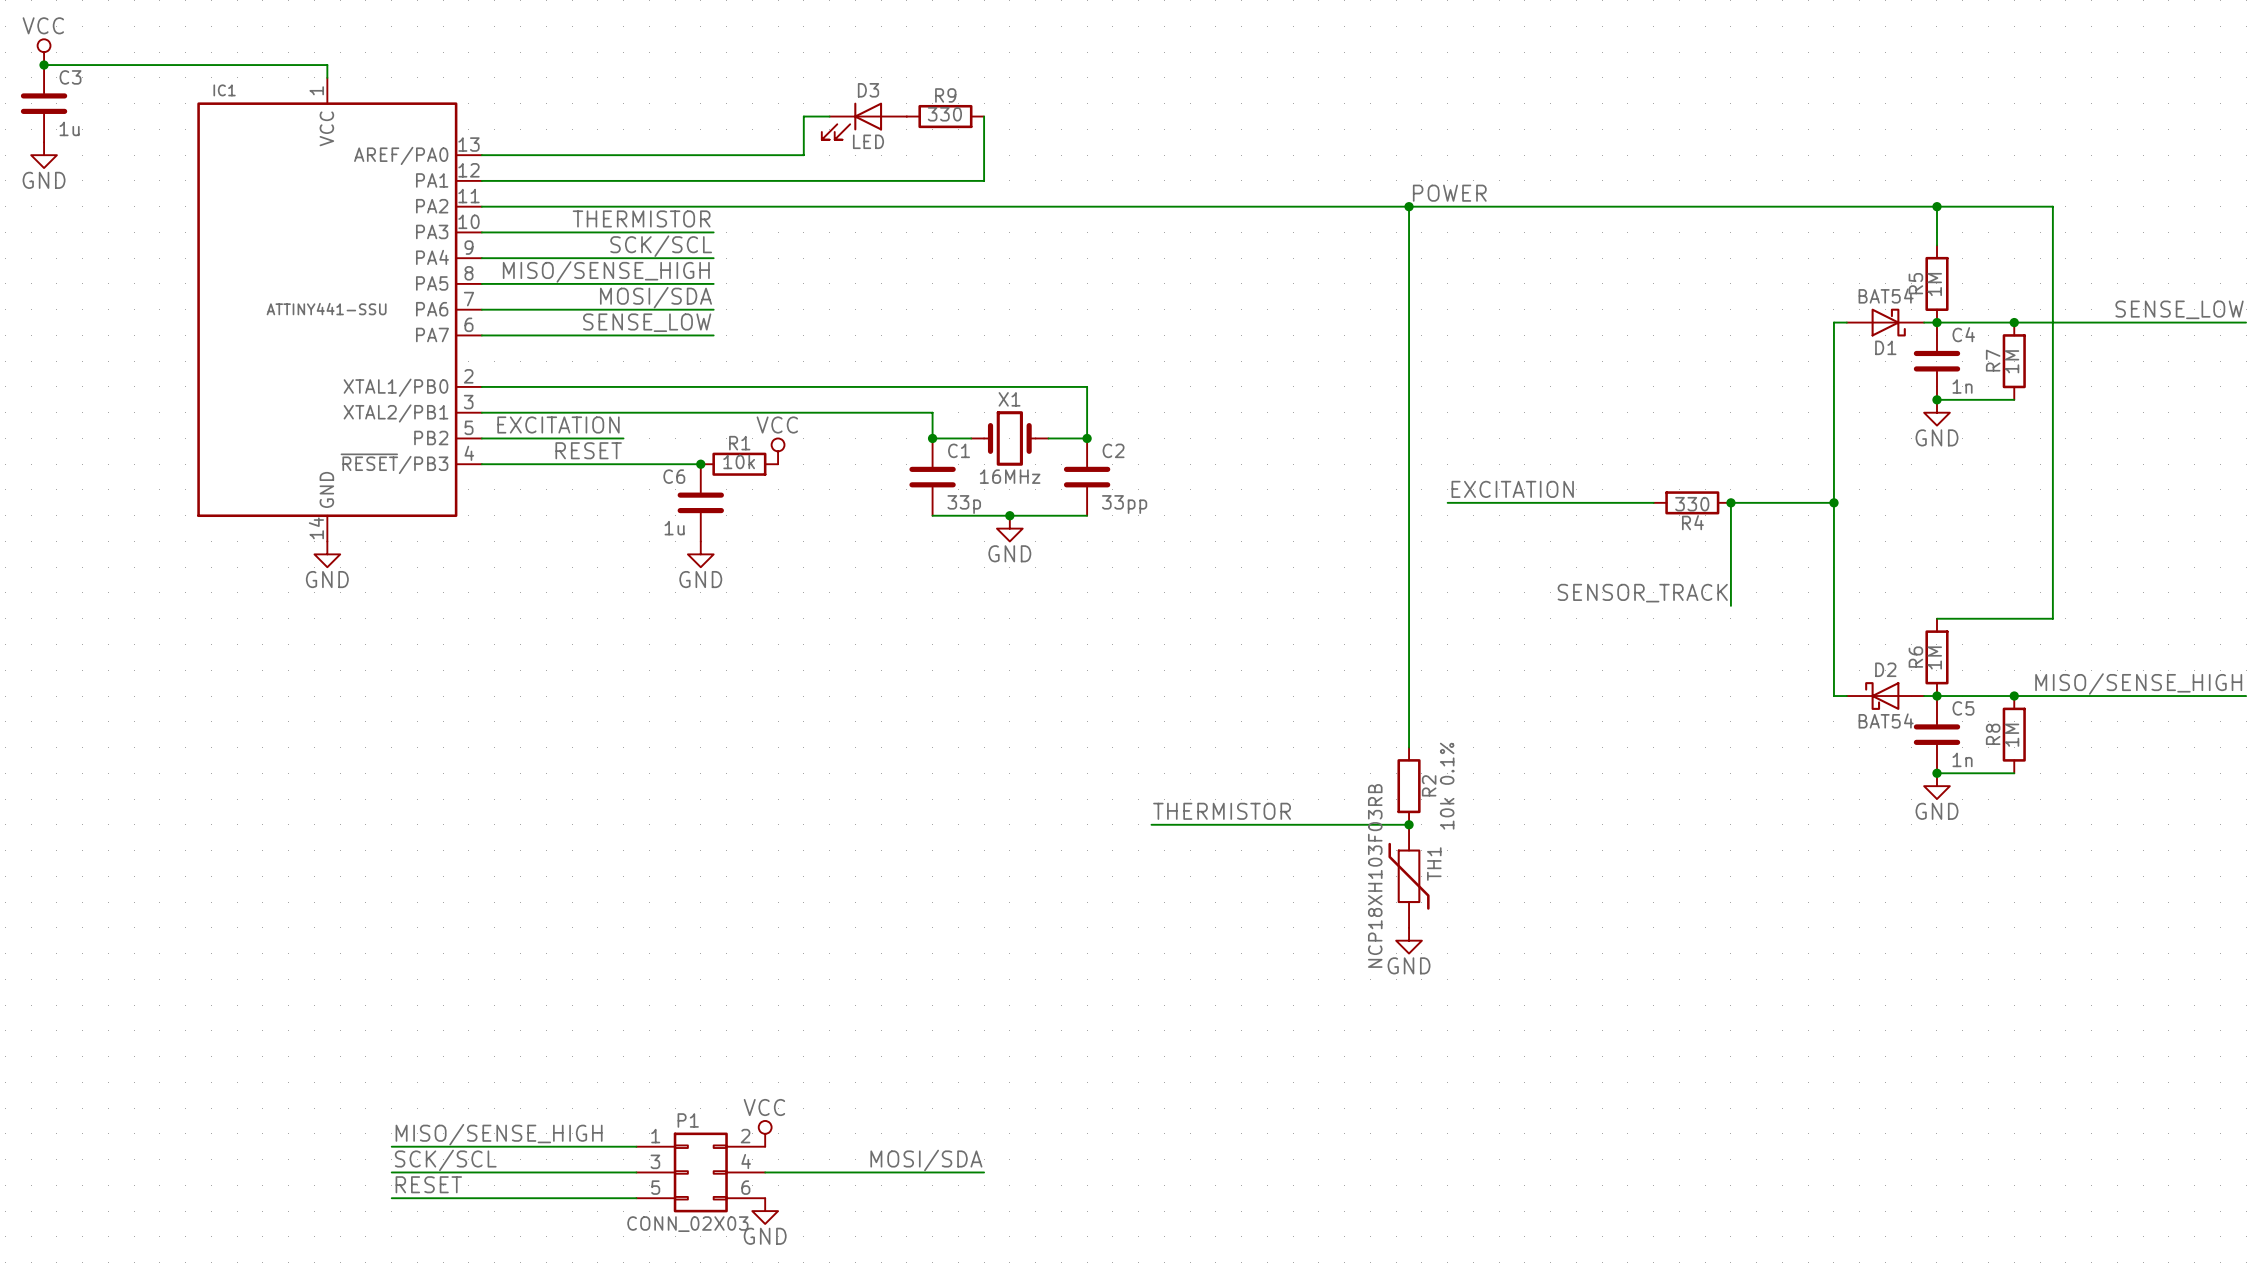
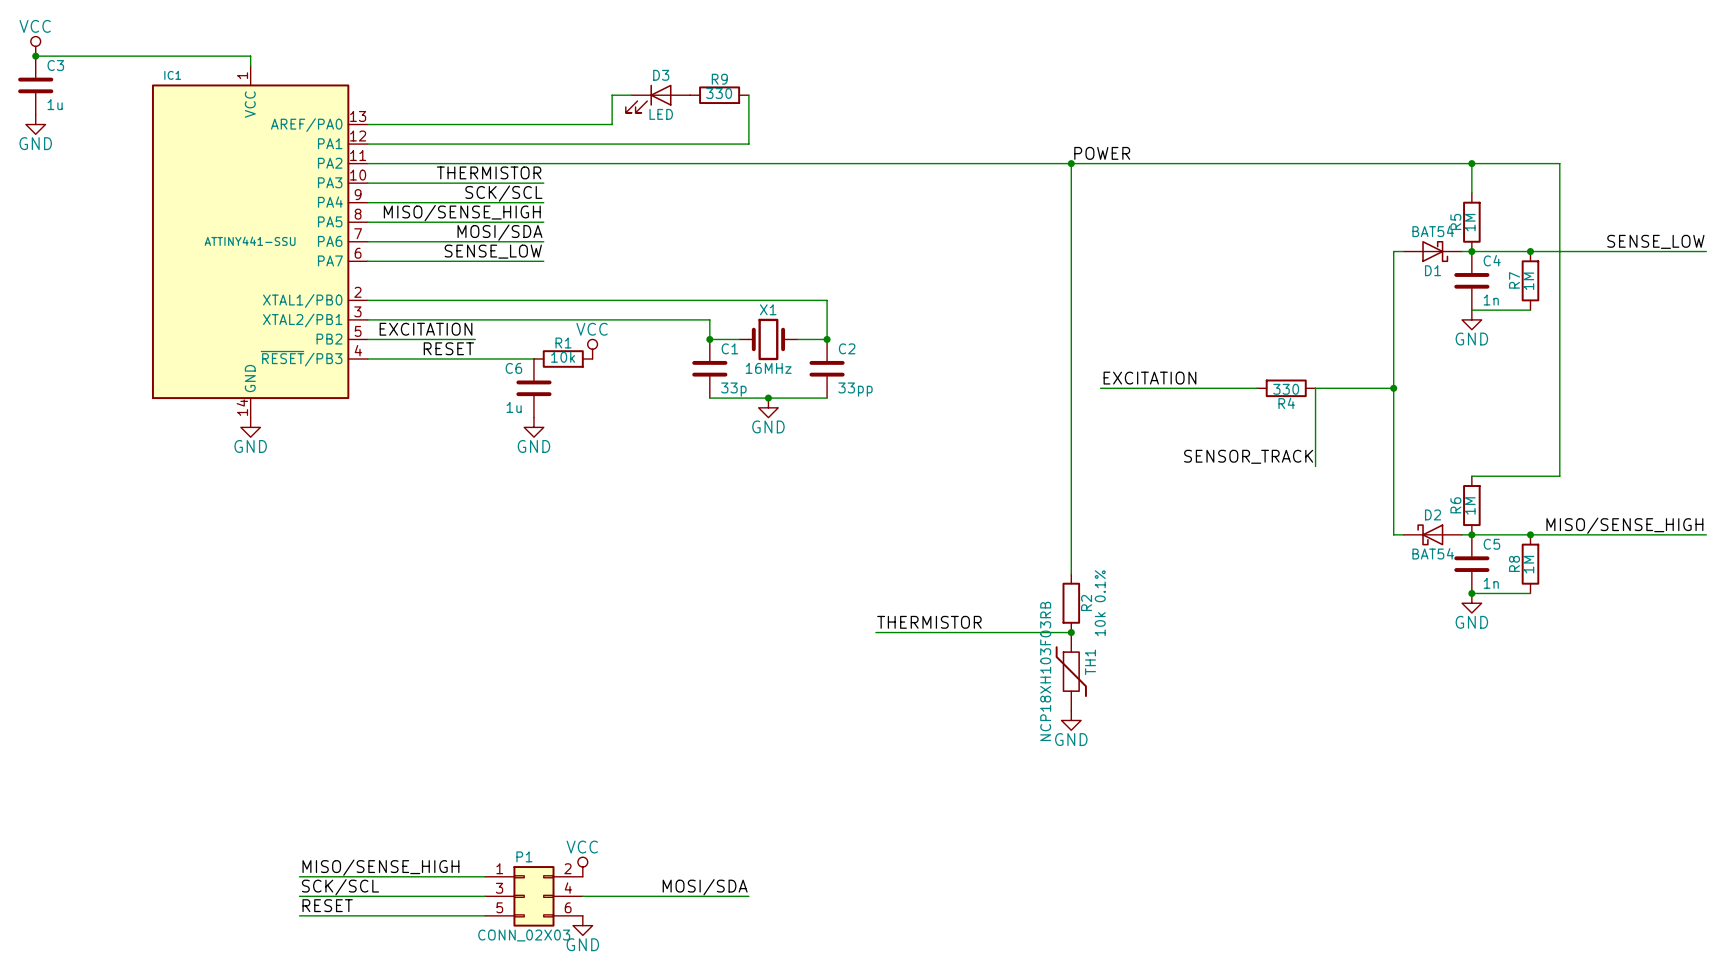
junction: (1936, 399) -> none
junction: (700, 464) -> none
junction: (1730, 502) -> none

